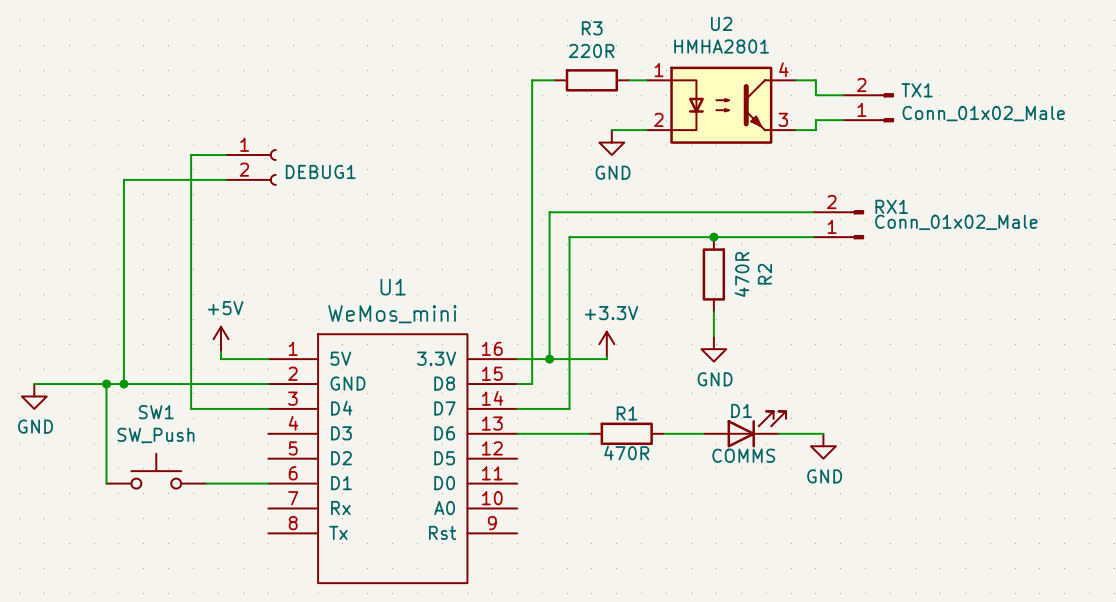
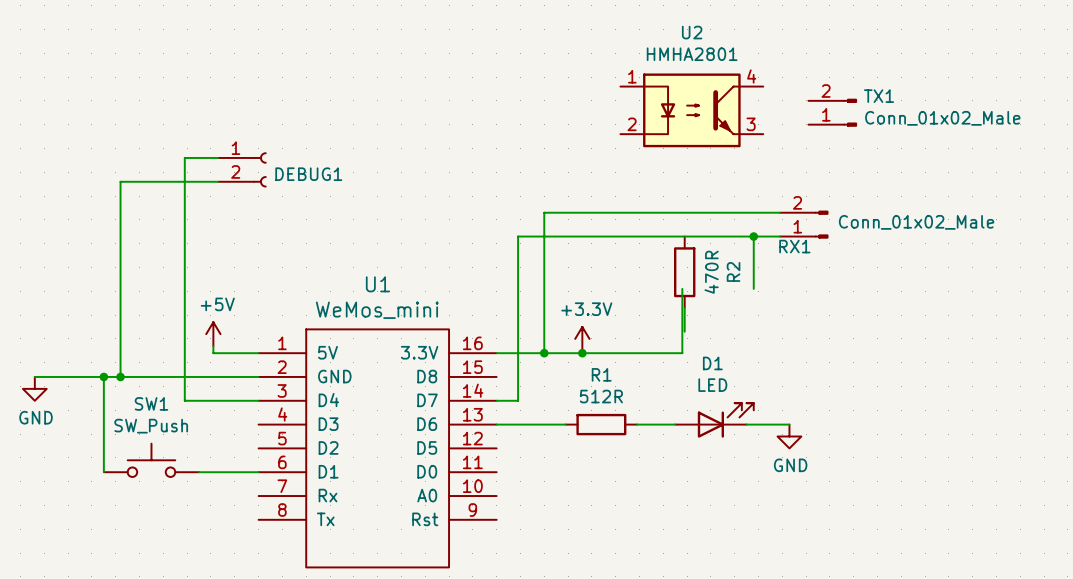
wire: (554, 80) (532, 80) (532, 384) (517, 384) -> none
R3: 220R (591, 80) -> none
wire: (629, 80) (646, 80) -> none
wire: (796, 80) (815, 80) (815, 95) (843, 95) -> none
wire: (843, 120) (815, 120) (815, 130) (796, 130) -> none
wire: (611, 130) (646, 130) -> none
power symbol: GND (611, 142) -> none
RX1 name position: RX1 (891, 206) -> RX1 (794, 246)
wire: (567, 212) (549, 212) (549, 359) -> (544, 212) (544, 353)
wire: (569, 237) (569, 408) (539, 408) -> (546, 236) (518, 236) (518, 400)
junction: (713, 237) -> none
wire: none -> (753, 236) (753, 288)
junction: none -> (753, 236)
wire: none -> (682, 288) (682, 353) (582, 353)
power symbol: GND (713, 349) -> none
junction position: (549, 359) -> (544, 353)
junction: none -> (582, 353)
D1 name position: D1 (741, 410) -> D1 (712, 363)
R1 name position: R1 (627, 413) -> R1 (601, 374)
R1 value: 470R (626, 452) -> 512R (601, 396)
D1 value: COMMS (743, 455) -> LED (712, 385)

